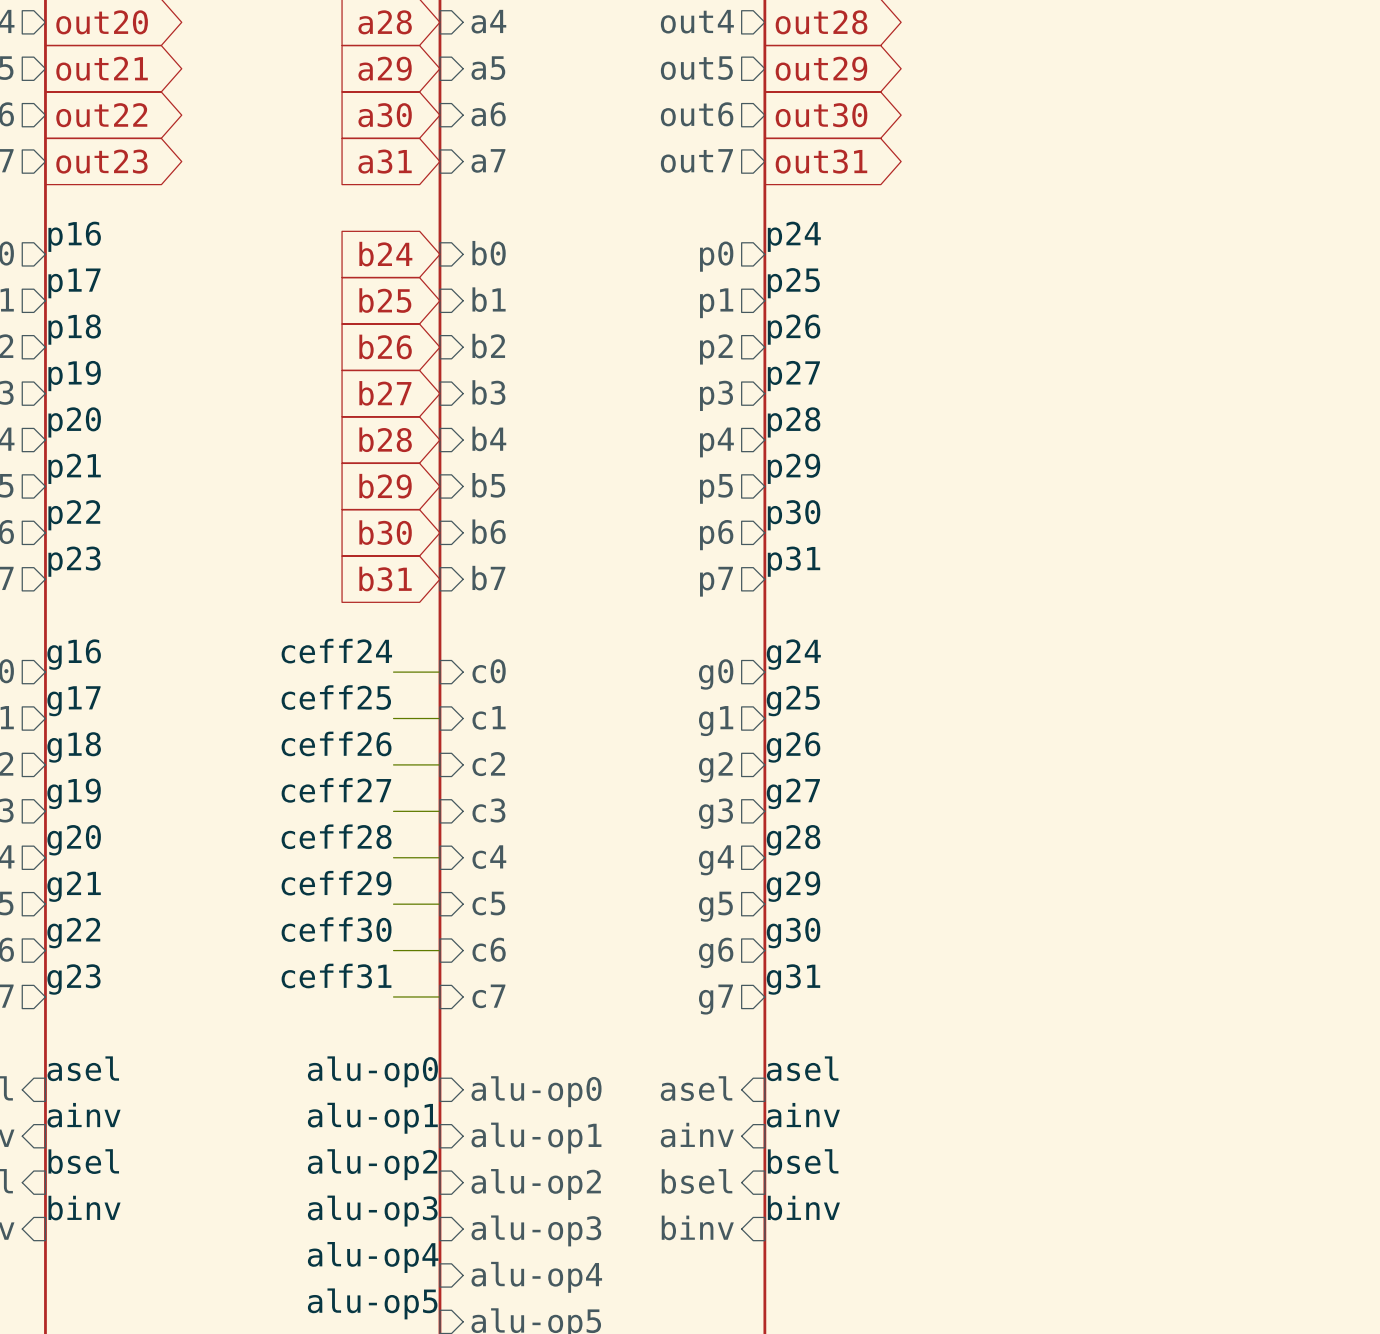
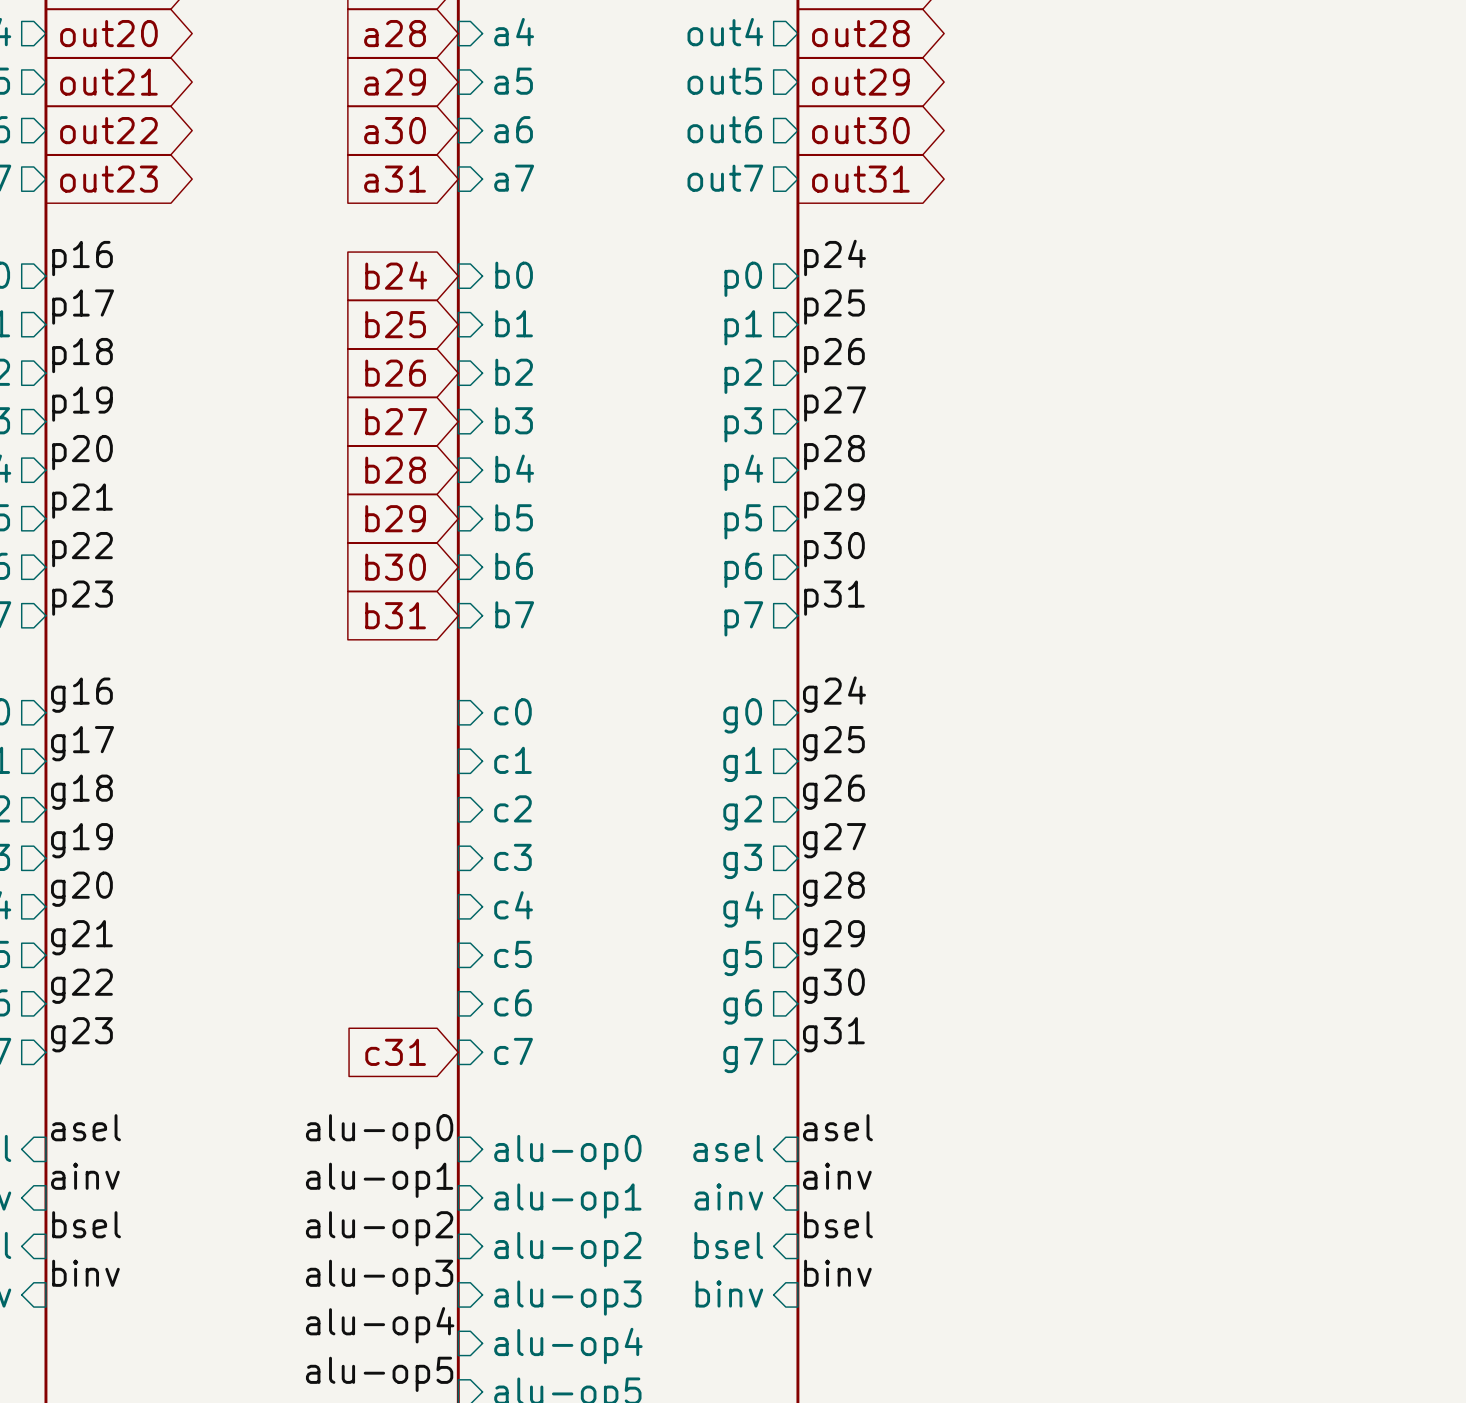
label: ceff24 (336, 651) -> none
wire: (393, 672) (439, 672) -> none
label: ceff25 (336, 697) -> none
wire: (393, 718) (439, 718) -> none
label: ceff26 (336, 743) -> none
wire: (393, 764) (439, 764) -> none
label: ceff27 (336, 790) -> none
wire: (393, 811) (439, 811) -> none
label: ceff28 (336, 836) -> none
wire: (393, 857) (439, 857) -> none
label: ceff29 (336, 883) -> none
wire: (393, 904) (439, 904) -> none
label: ceff30 (336, 929) -> none
wire: (393, 950) (439, 950) -> none
label: ceff31 (336, 976) -> none
wire: (393, 996) (439, 996) -> none
global label: none -> c31 (395, 1052)

